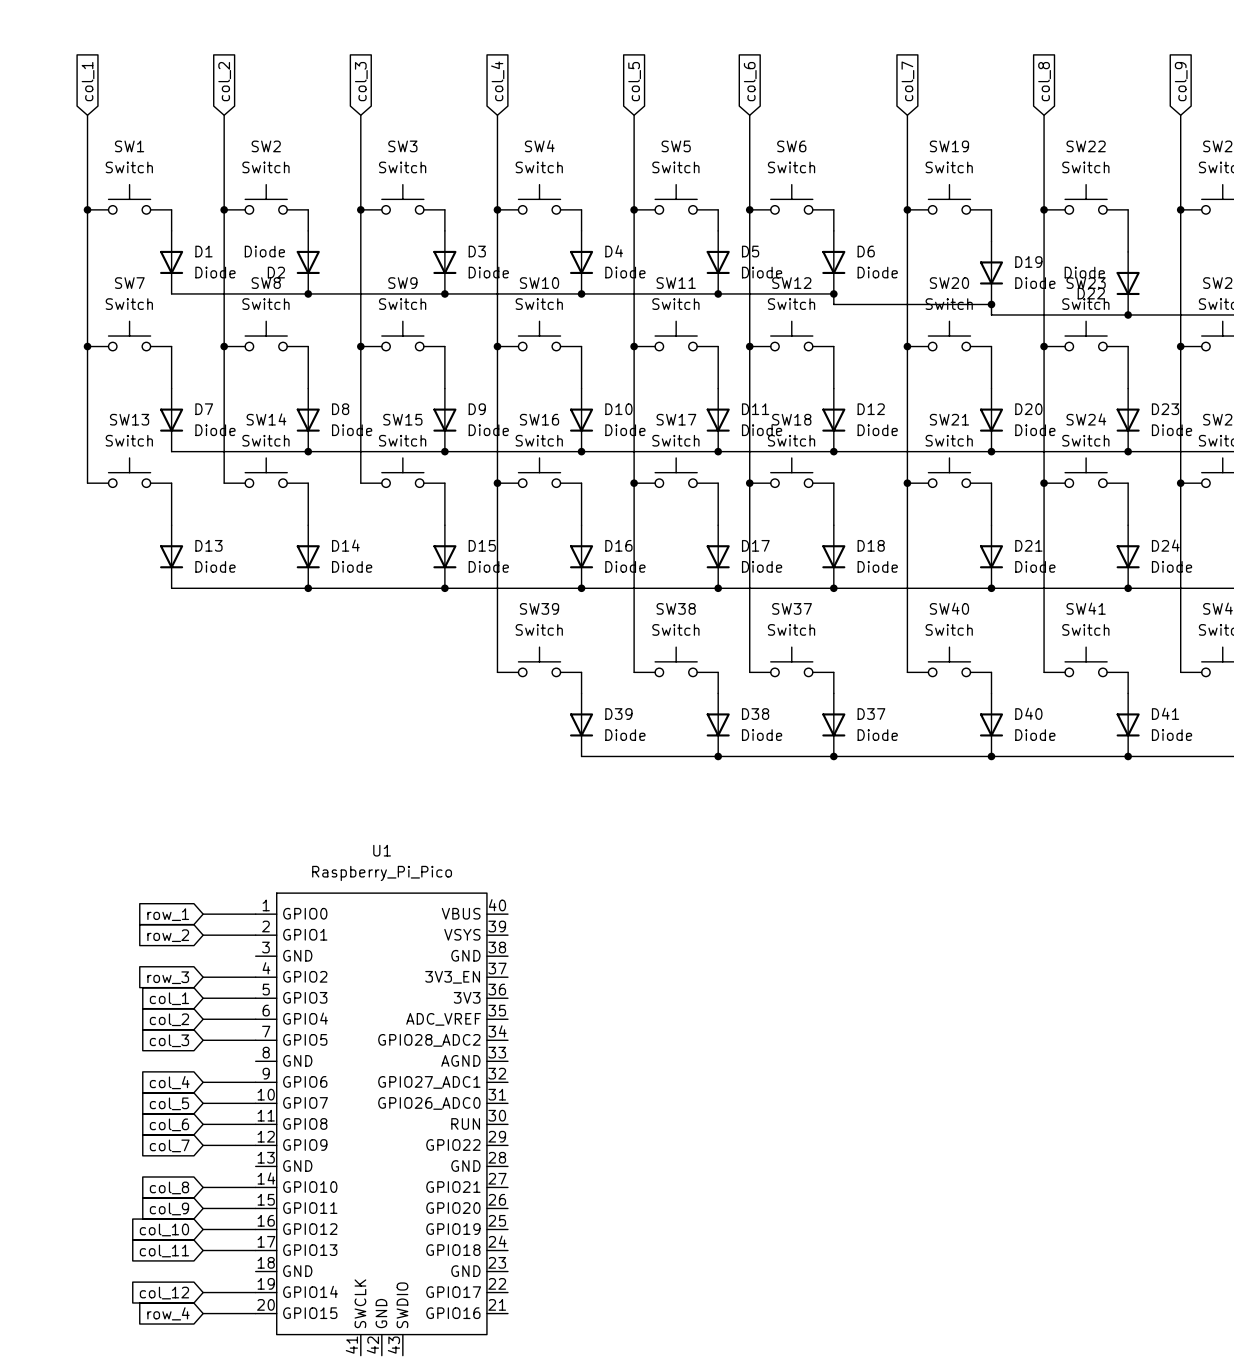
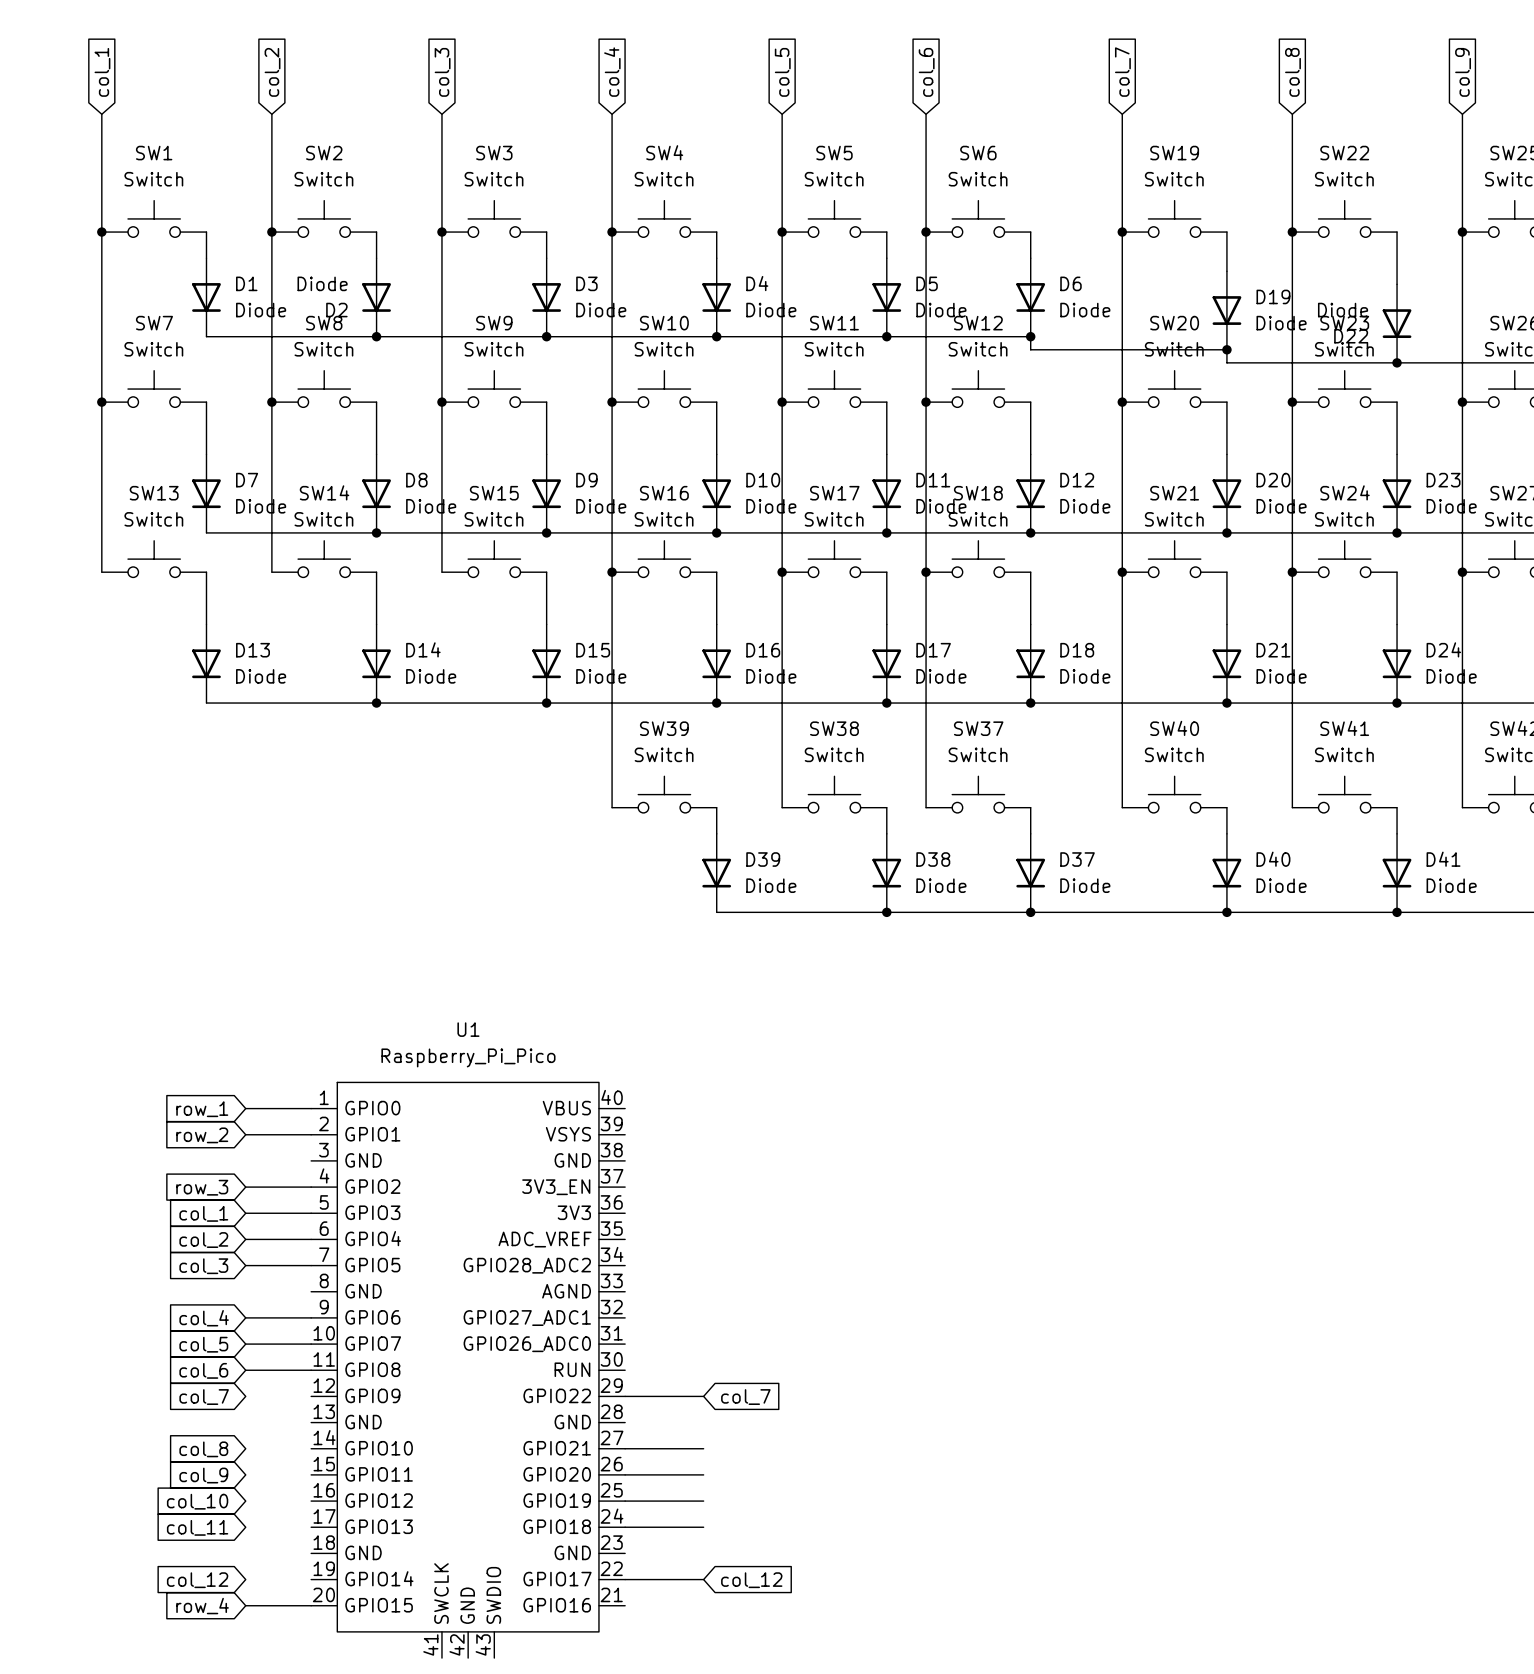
wire: (203, 1145) (255, 1145) -> none
wire: none -> (625, 1396) (703, 1396)
global label: none -> col_7 (745, 1397)
wire: (203, 1187) (255, 1187) -> none
wire: none -> (625, 1448) (703, 1448)
wire: (203, 1208) (255, 1208) -> none
wire: none -> (625, 1474) (703, 1474)
wire: (203, 1229) (255, 1229) -> none
wire: none -> (625, 1501) (703, 1501)
wire: (203, 1250) (255, 1250) -> none
wire: none -> (625, 1527) (703, 1527)
wire: (203, 1292) (255, 1292) -> none
wire: none -> (625, 1579) (703, 1579)
global label: none -> col_12 (751, 1580)

